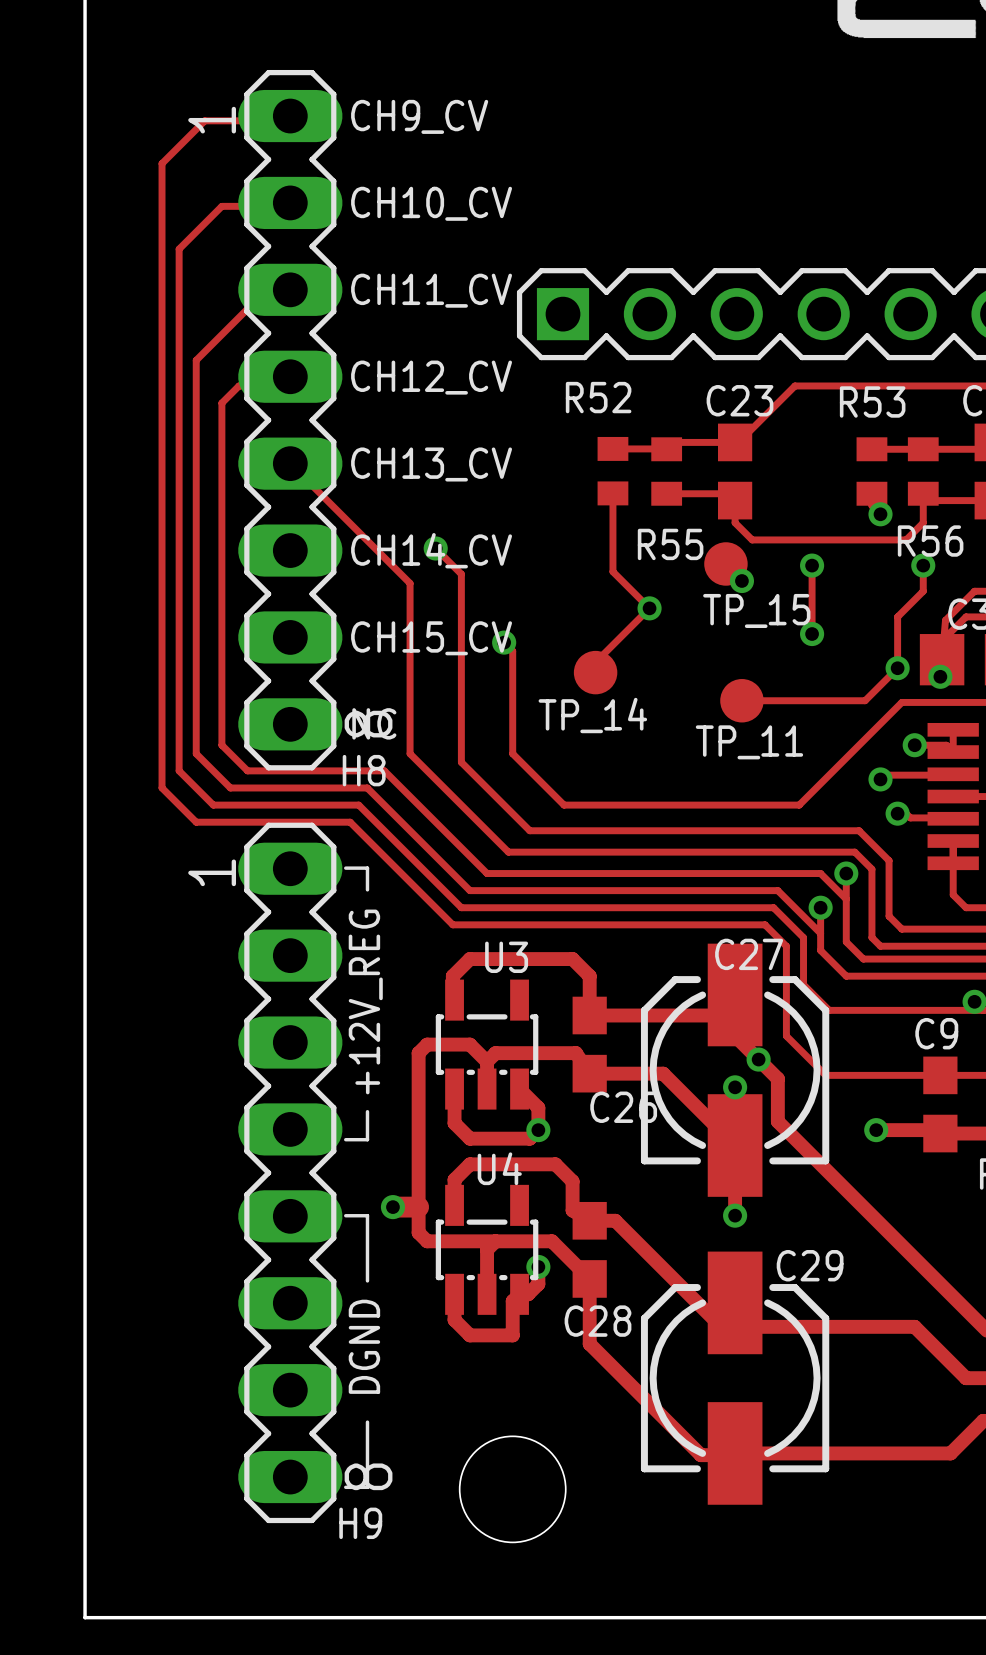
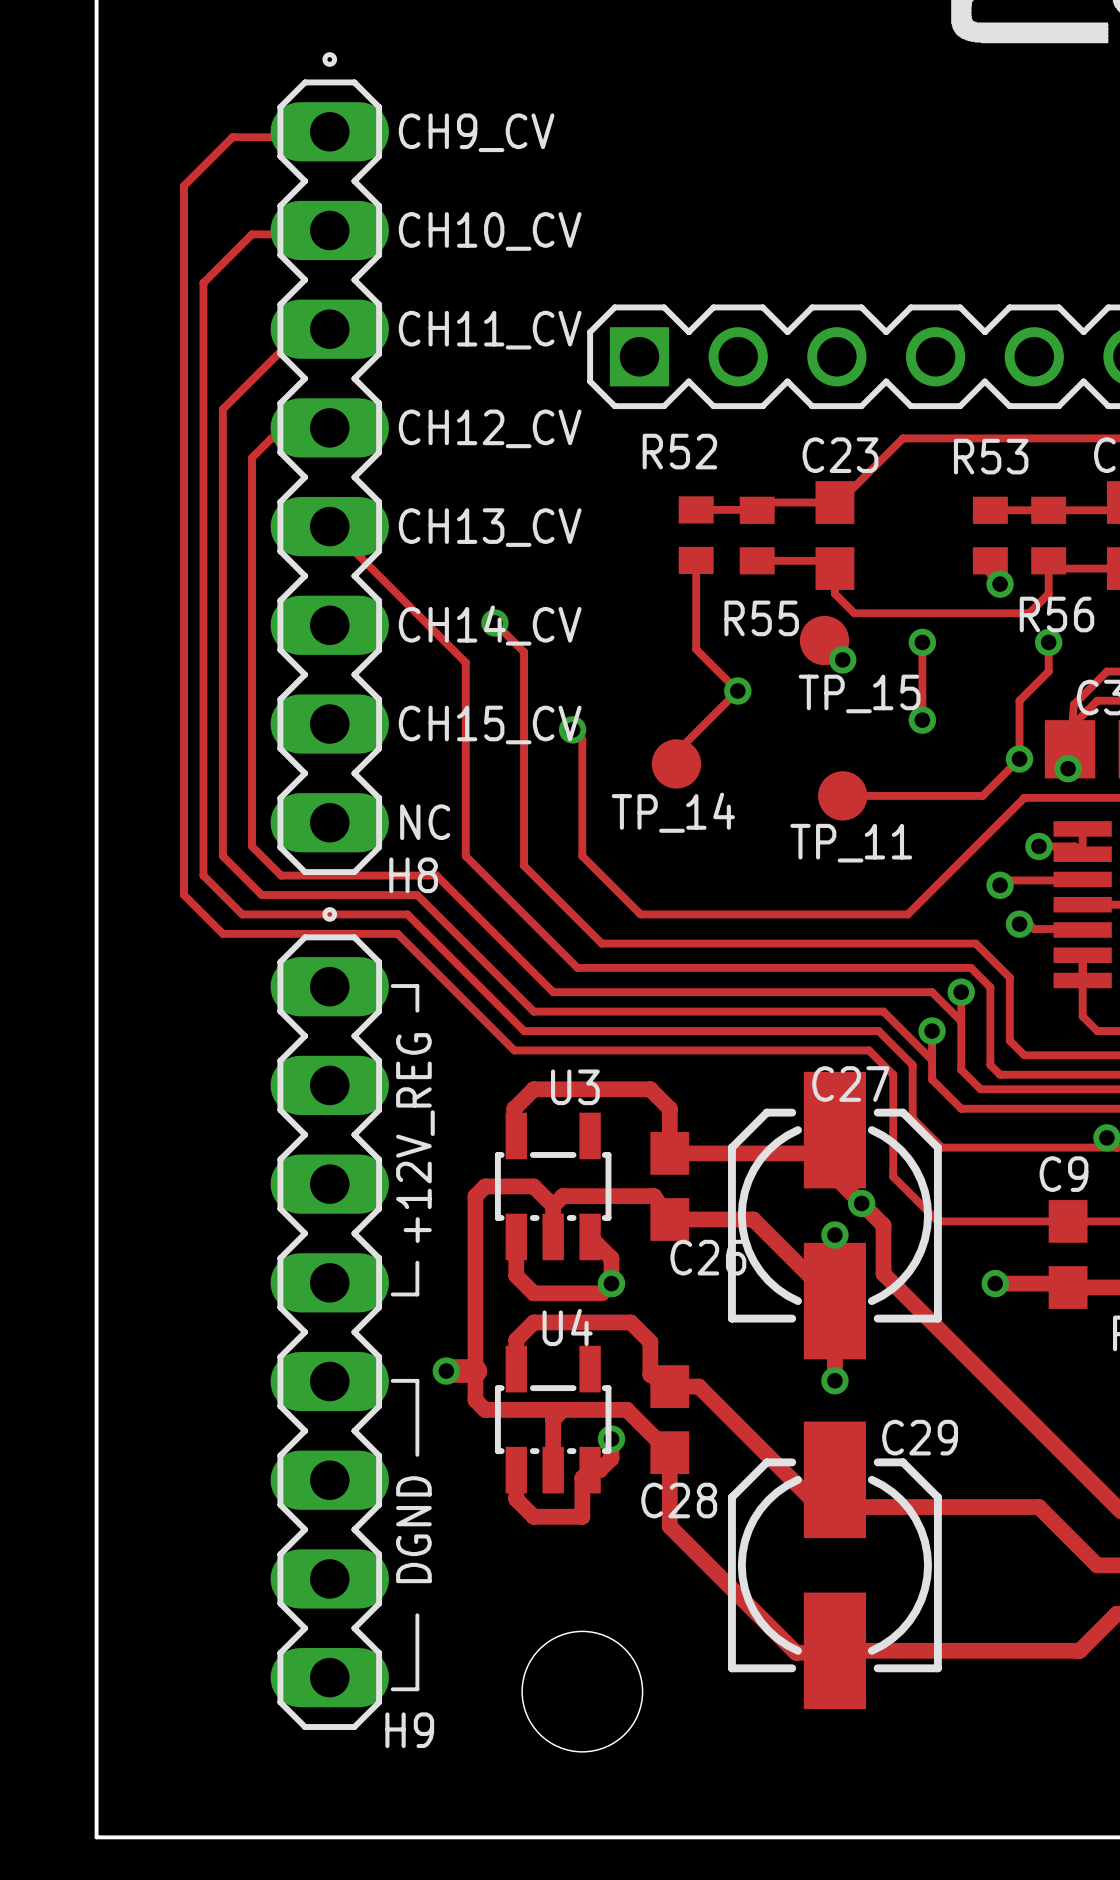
H8 footprint: [238, 69, 343, 771] -> [270, 52, 389, 876]
H9 footprint: [238, 822, 343, 1524] -> [270, 907, 389, 1730]

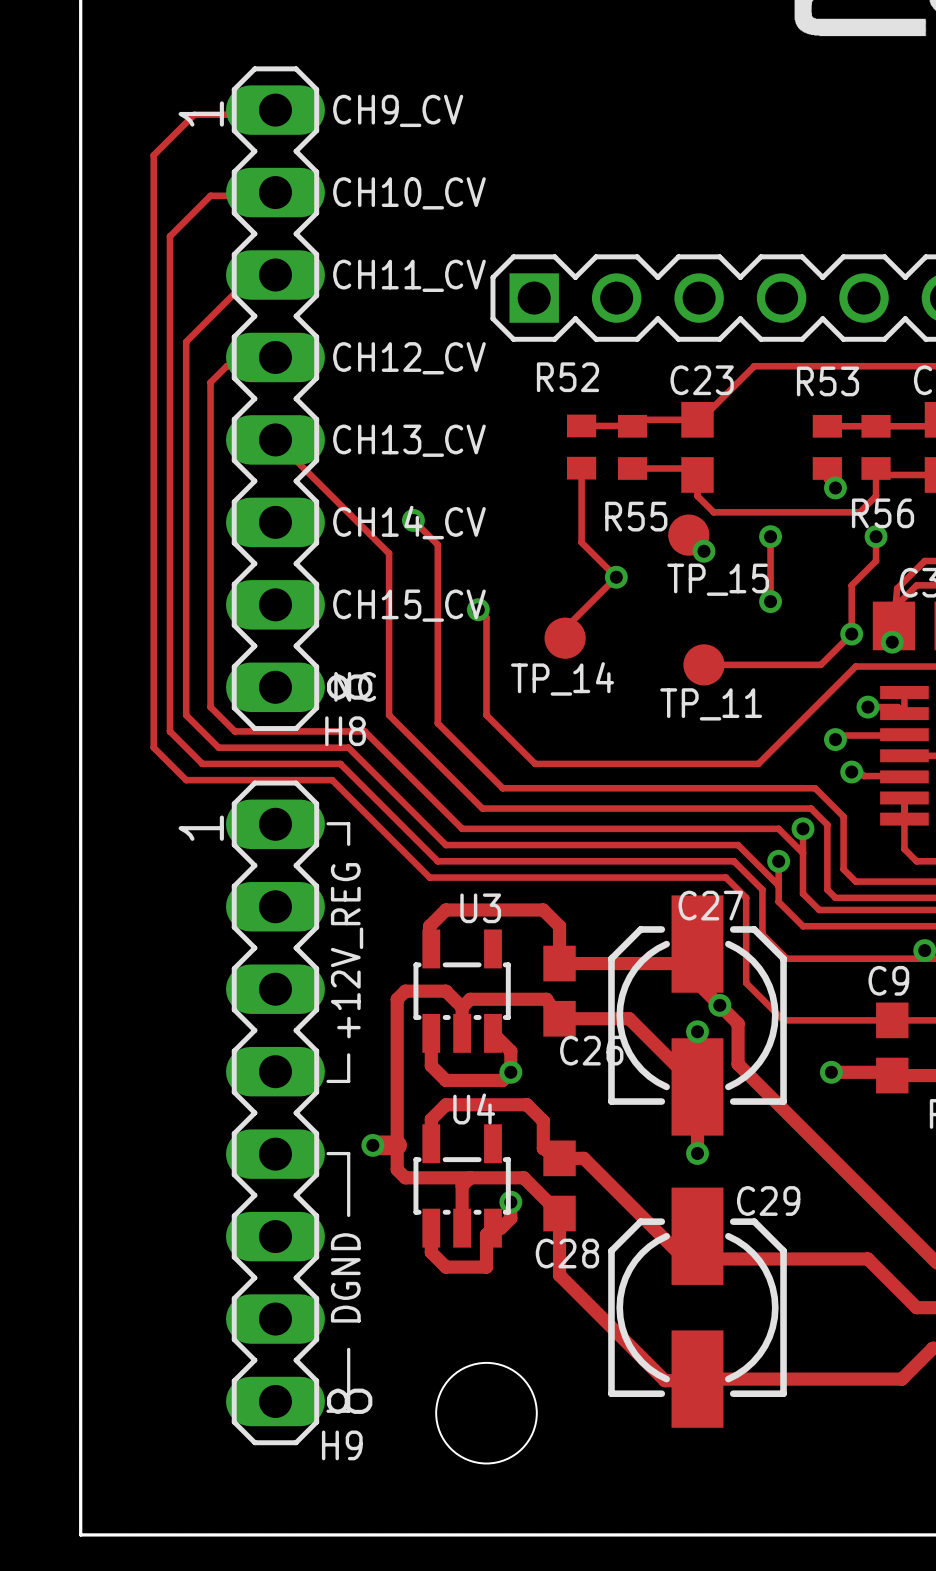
H8 footprint: [270, 52, 389, 876] -> [226, 66, 325, 732]
H9 footprint: [270, 907, 389, 1730] -> [226, 780, 325, 1446]

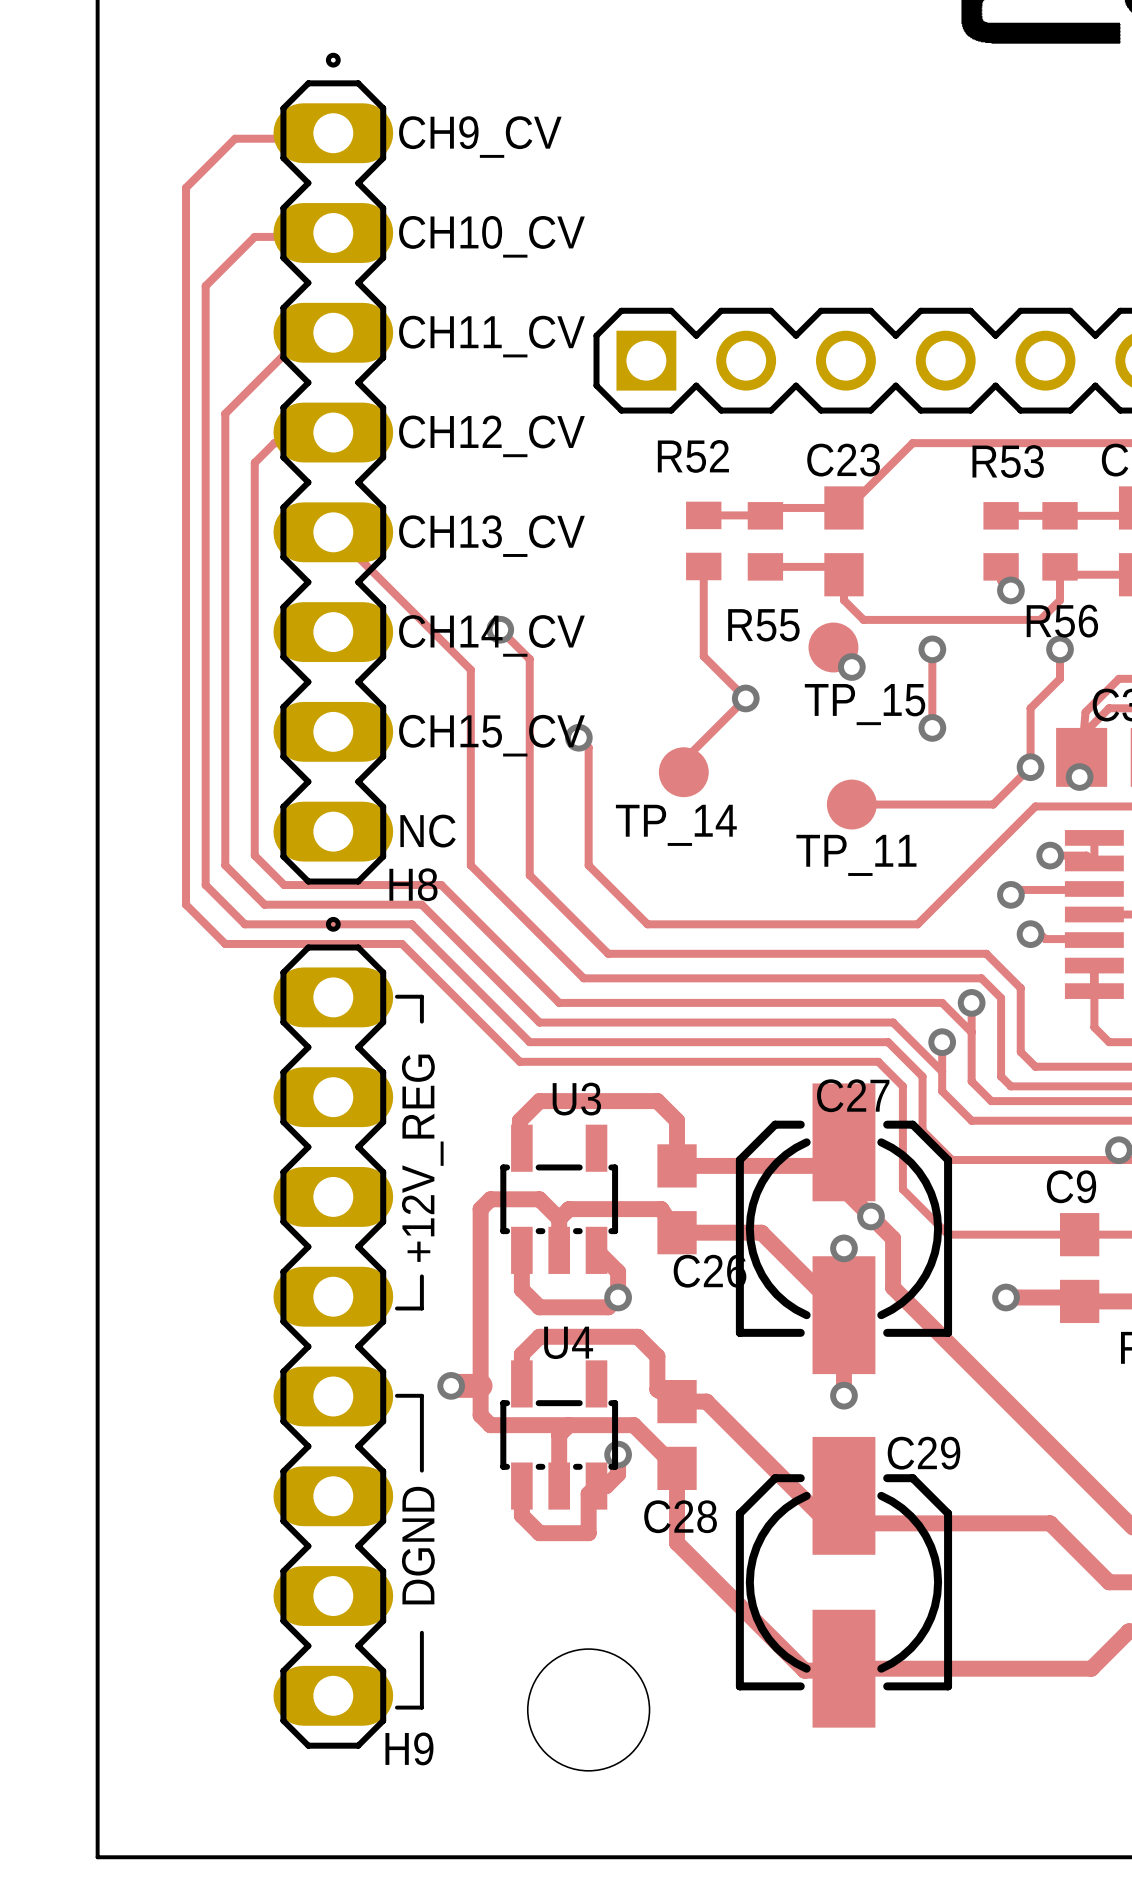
H8 footprint: [226, 66, 325, 732] -> [273, 52, 394, 885]
H9 footprint: [226, 780, 325, 1446] -> [273, 916, 394, 1749]

